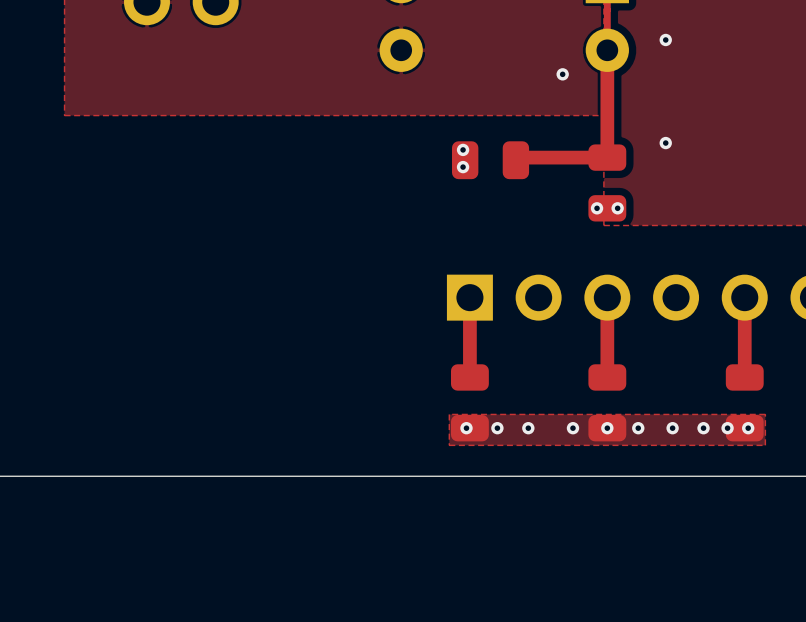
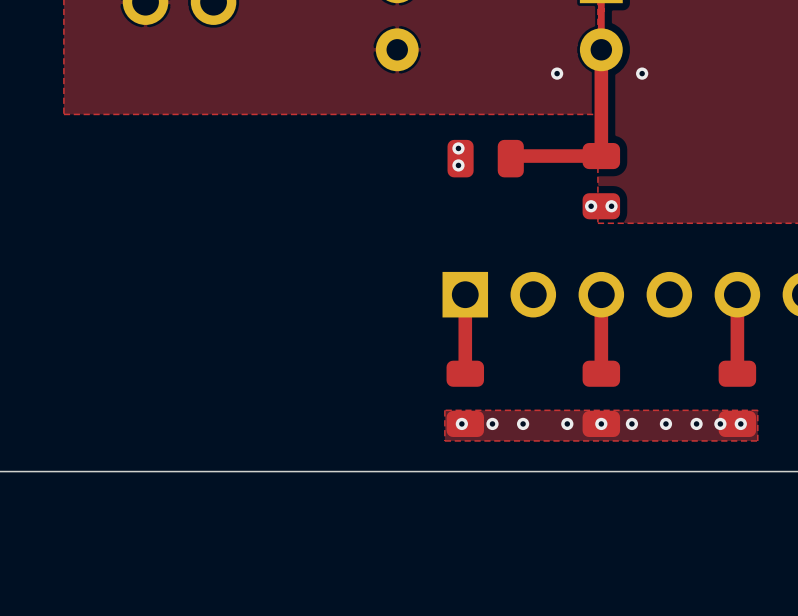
via: (665, 39) -> none
via: none -> (642, 73)
via: (665, 143) -> none

